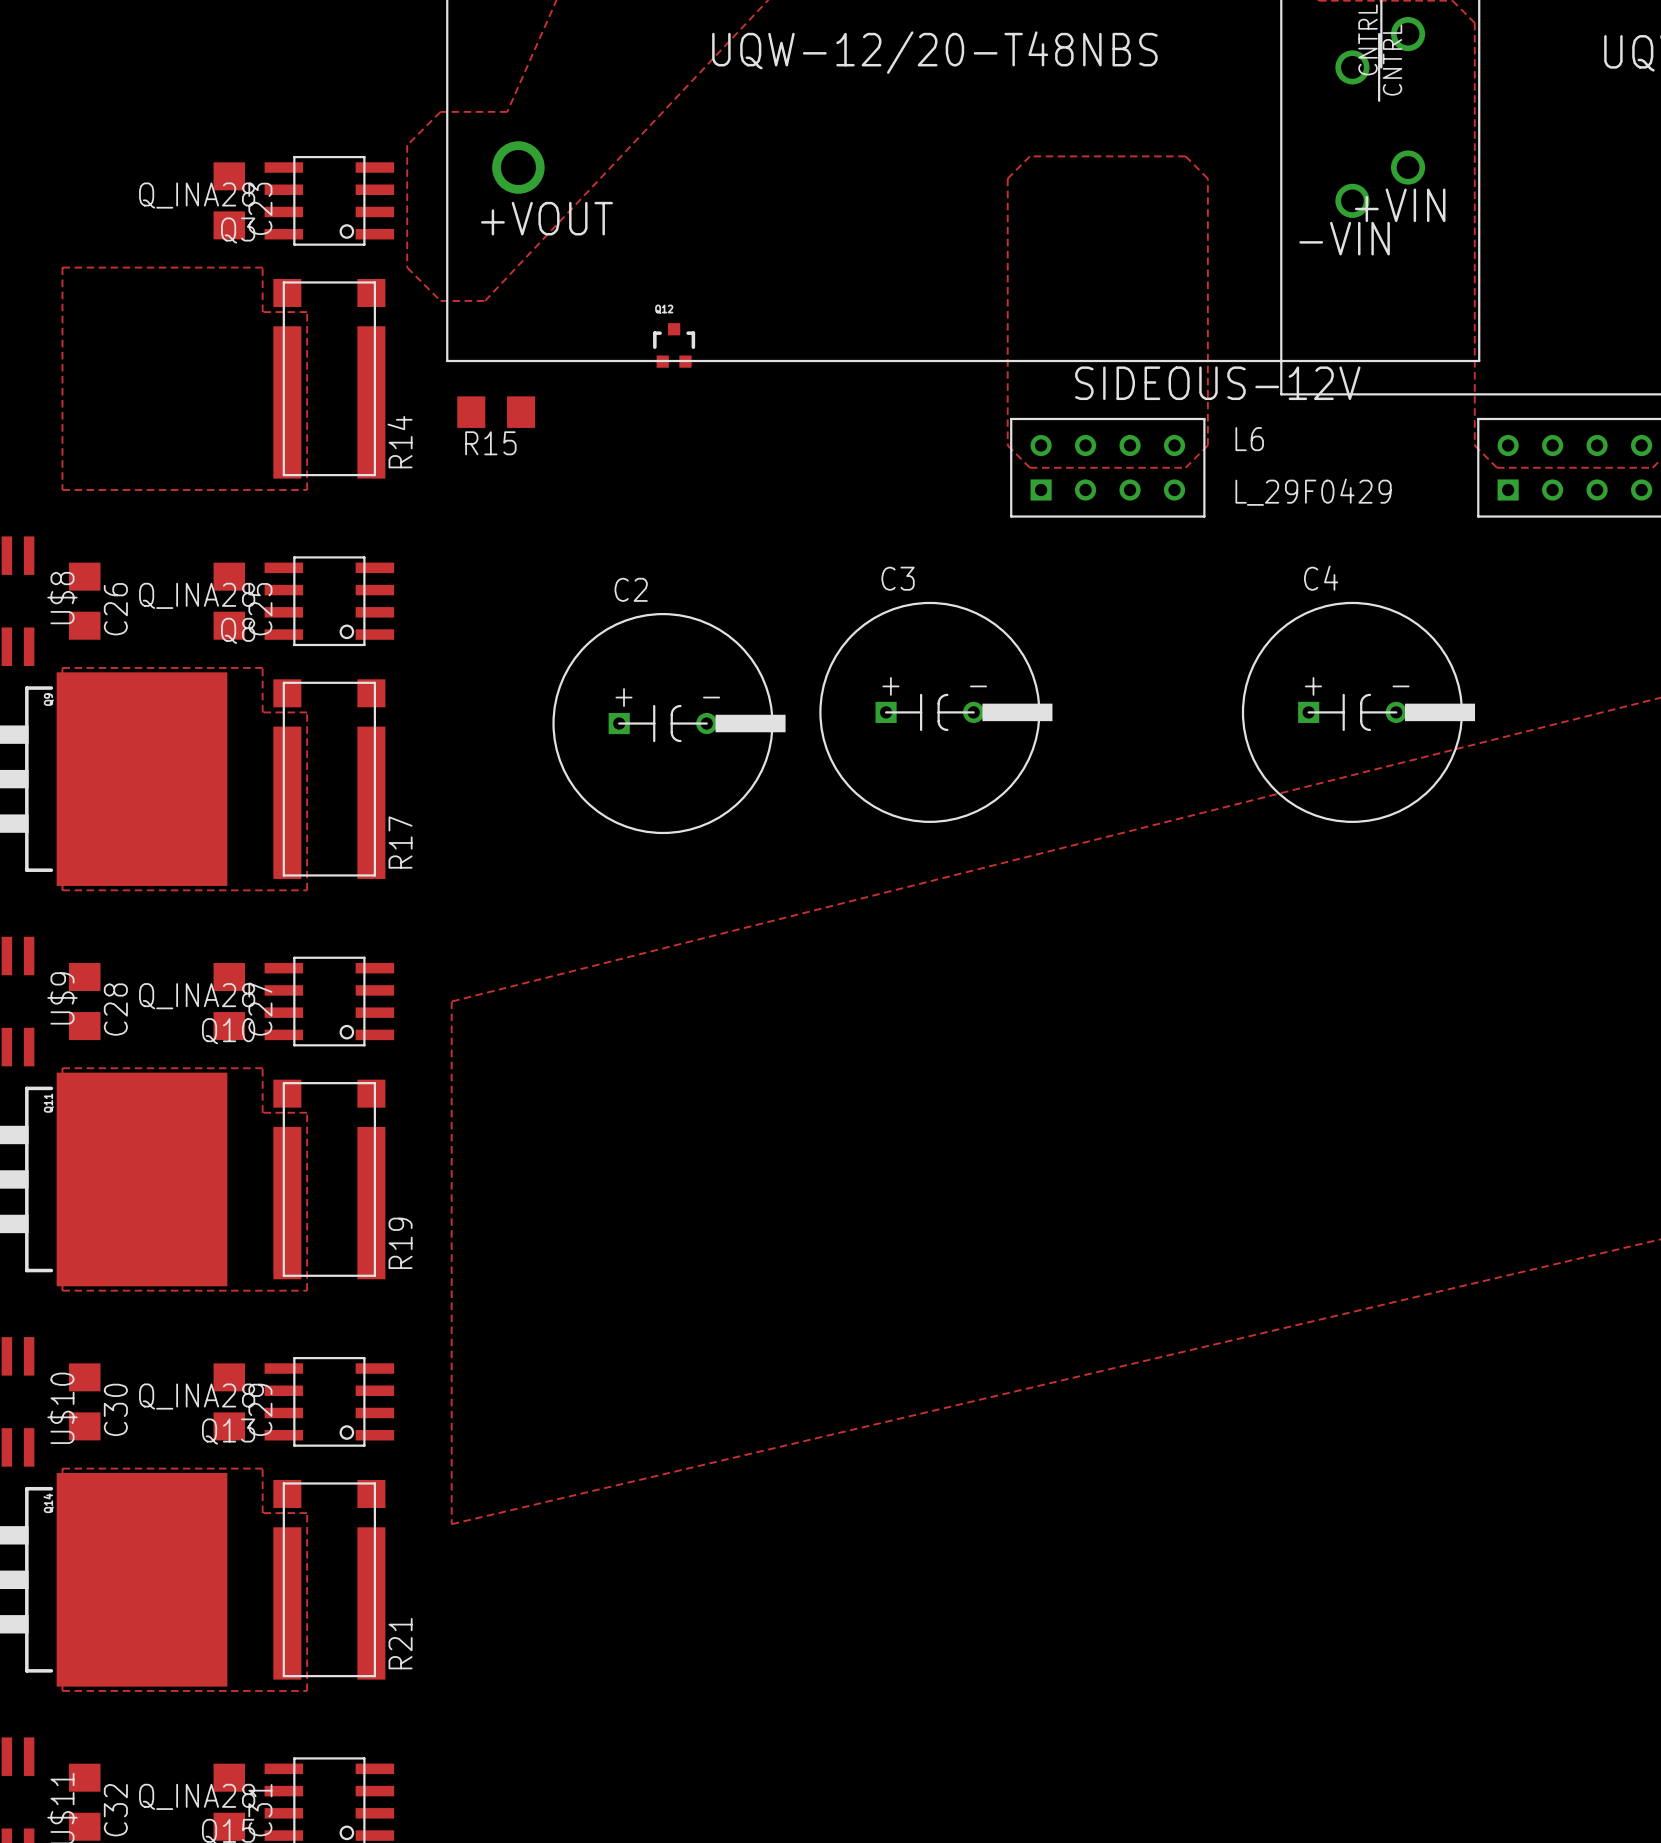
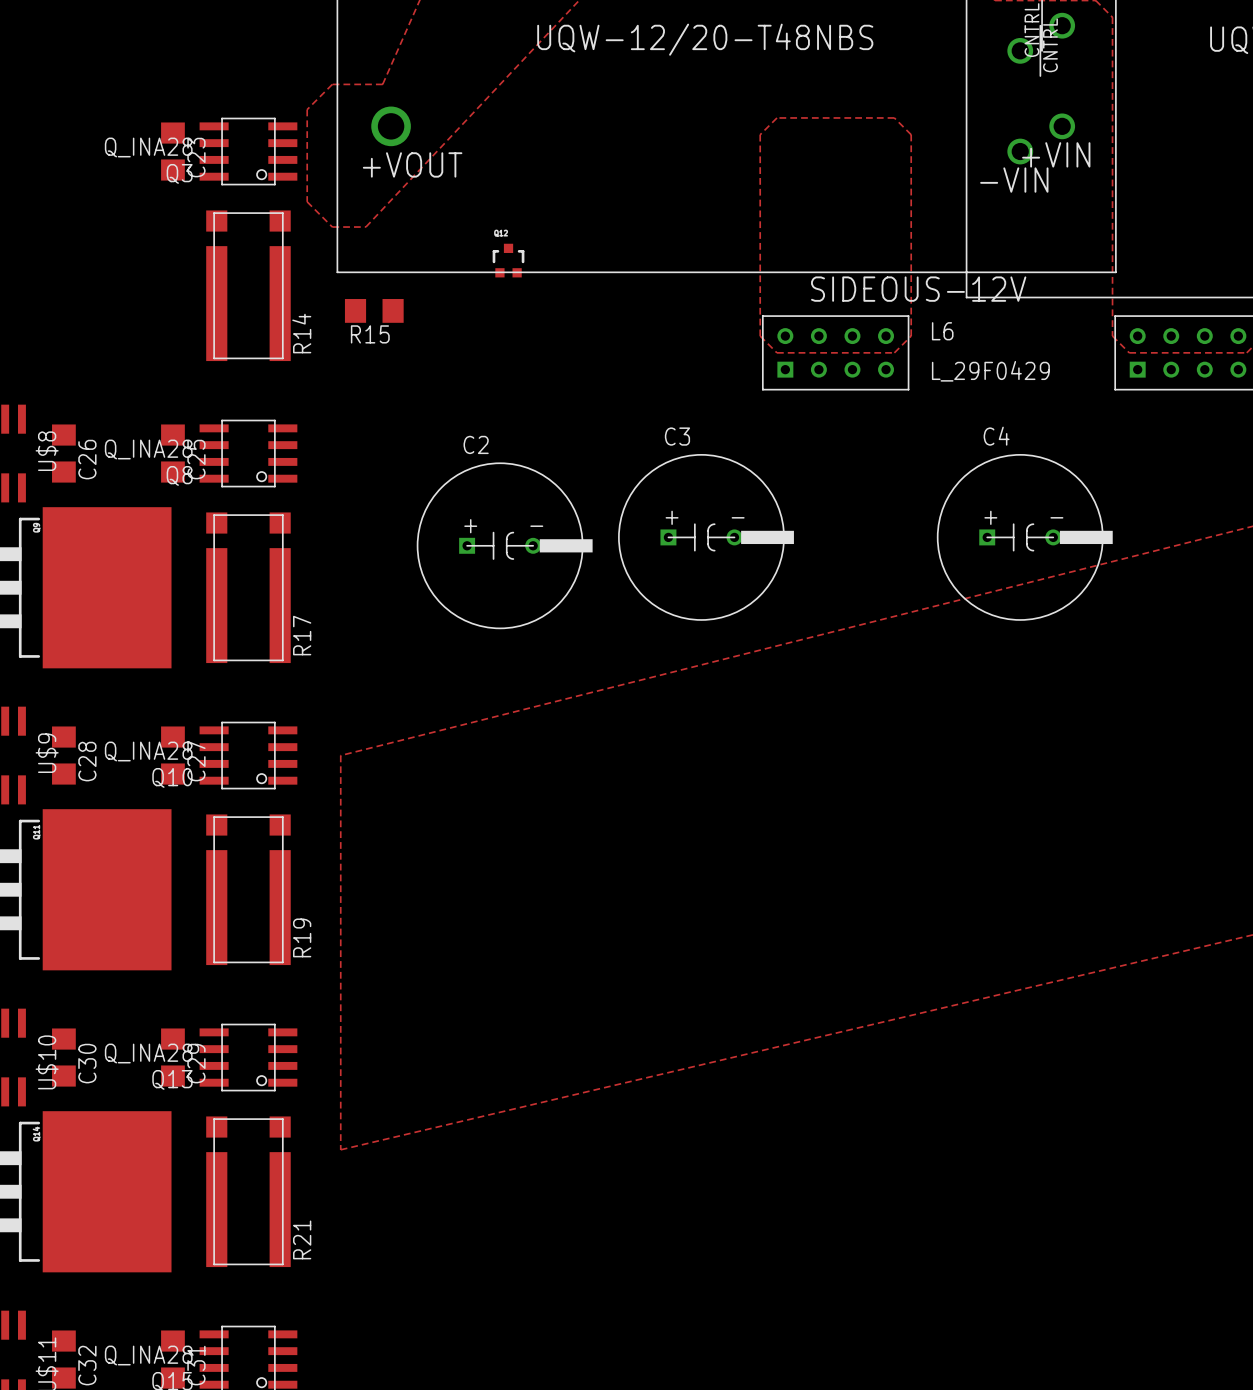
top zone outline: (62, 267) (262, 267) (262, 312) (307, 312) (307, 489) (62, 489) (62, 267) -> none
top zone outline: (62, 667) (62, 890) (307, 890) (307, 712) (262, 712) (262, 667) (62, 667) -> none
top zone outline: (62, 1068) (62, 1290) (307, 1290) (307, 1112) (262, 1112) (262, 1068) (62, 1068) -> none
top zone outline: (62, 1468) (62, 1691) (307, 1691) (307, 1513) (262, 1513) (262, 1468) (62, 1468) -> none

